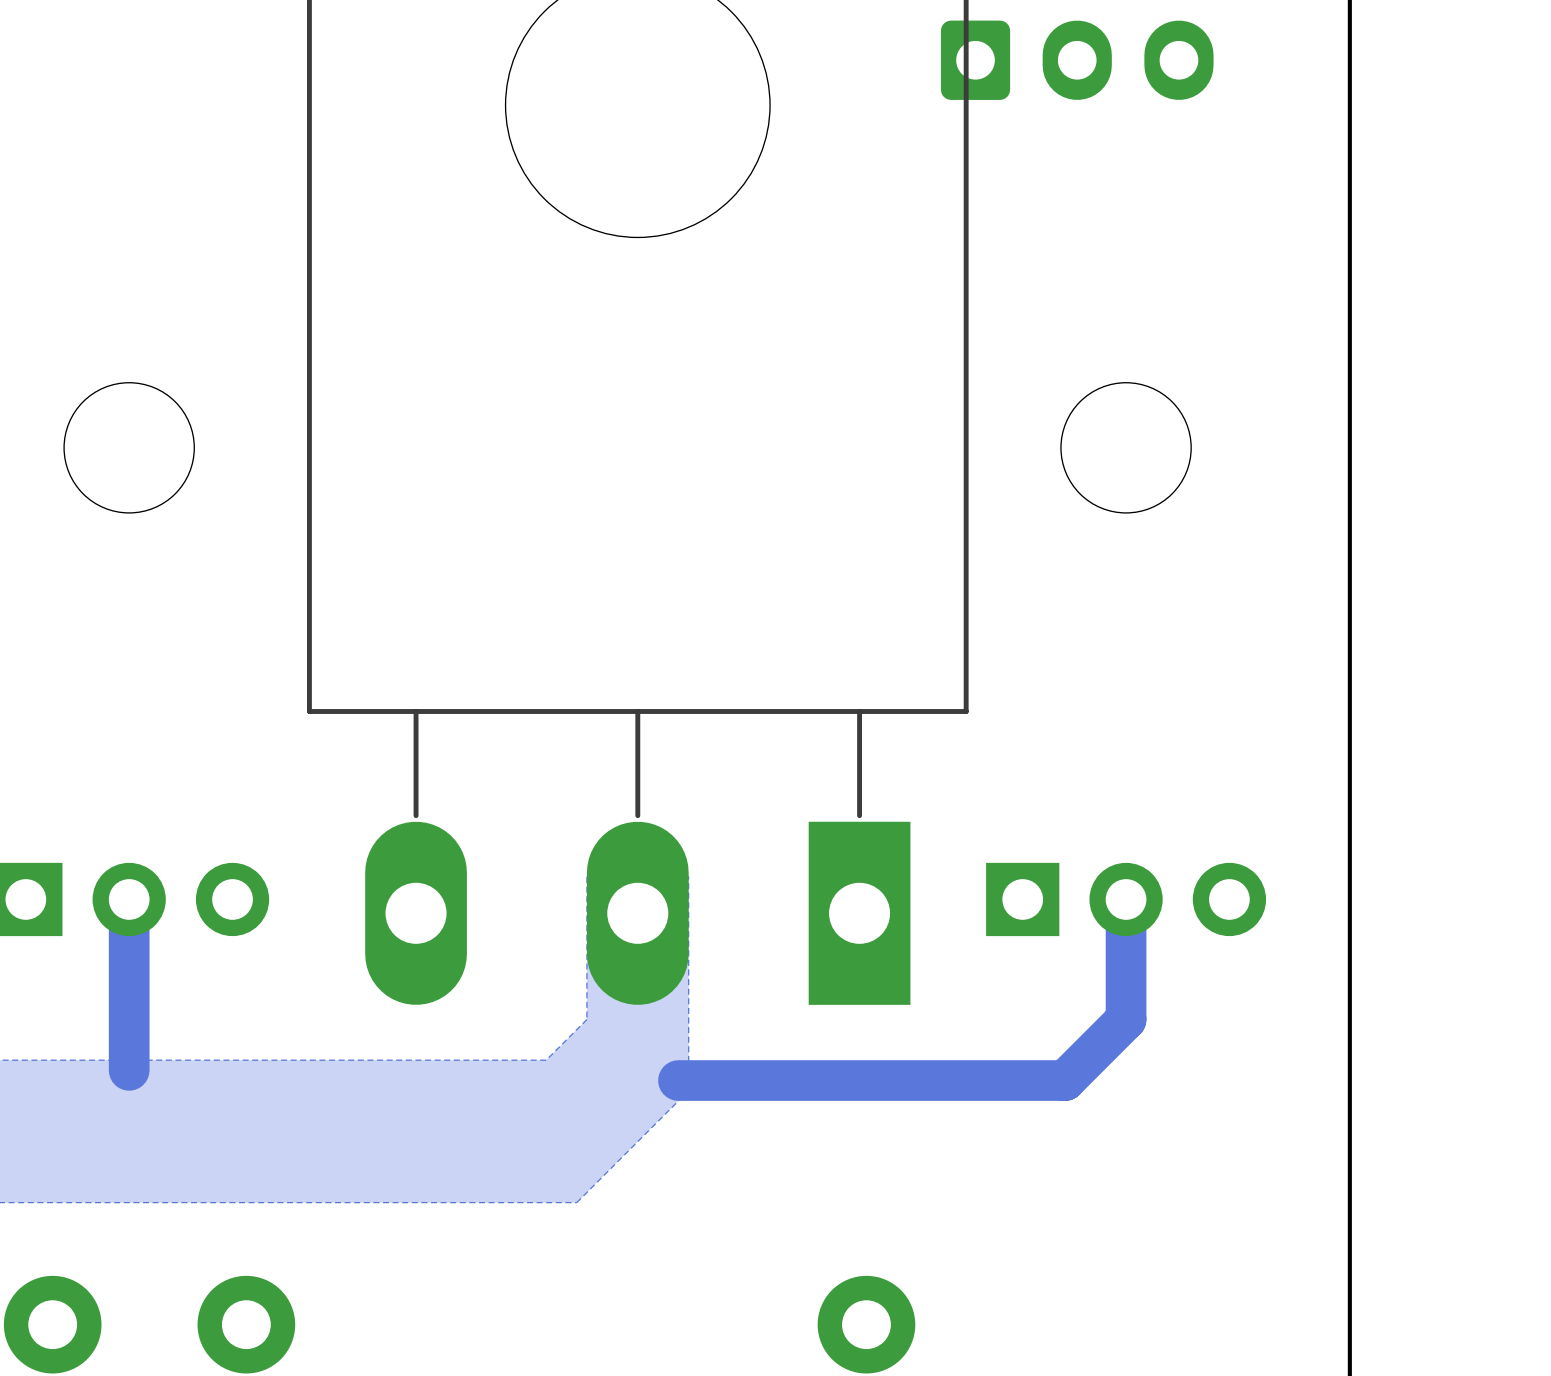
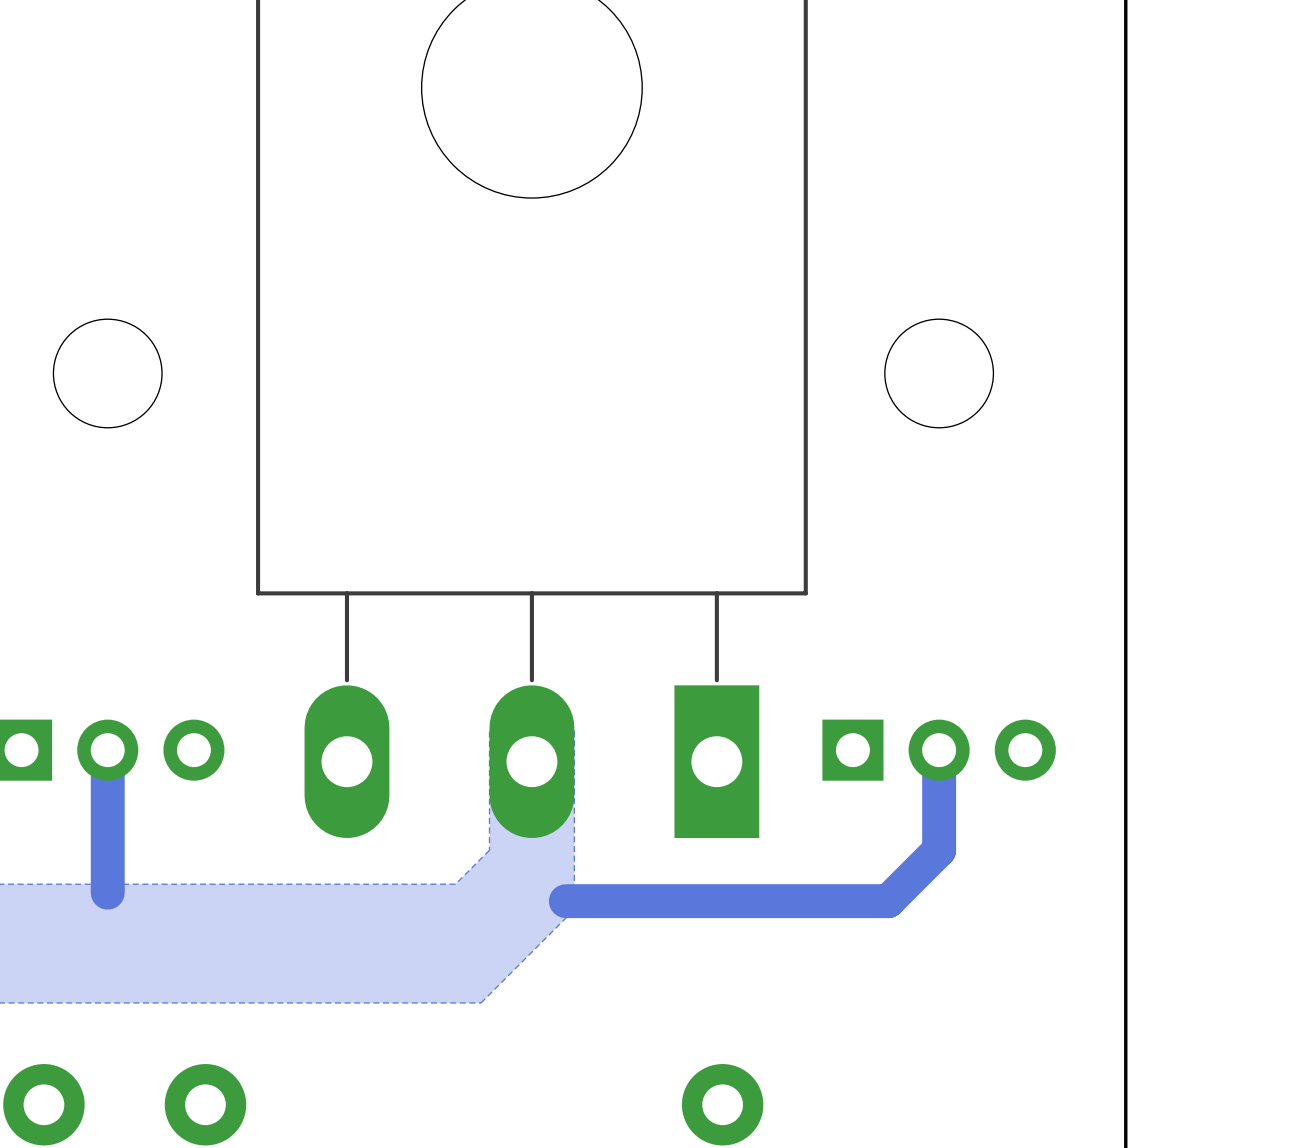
part: (1077, 60) -> none

